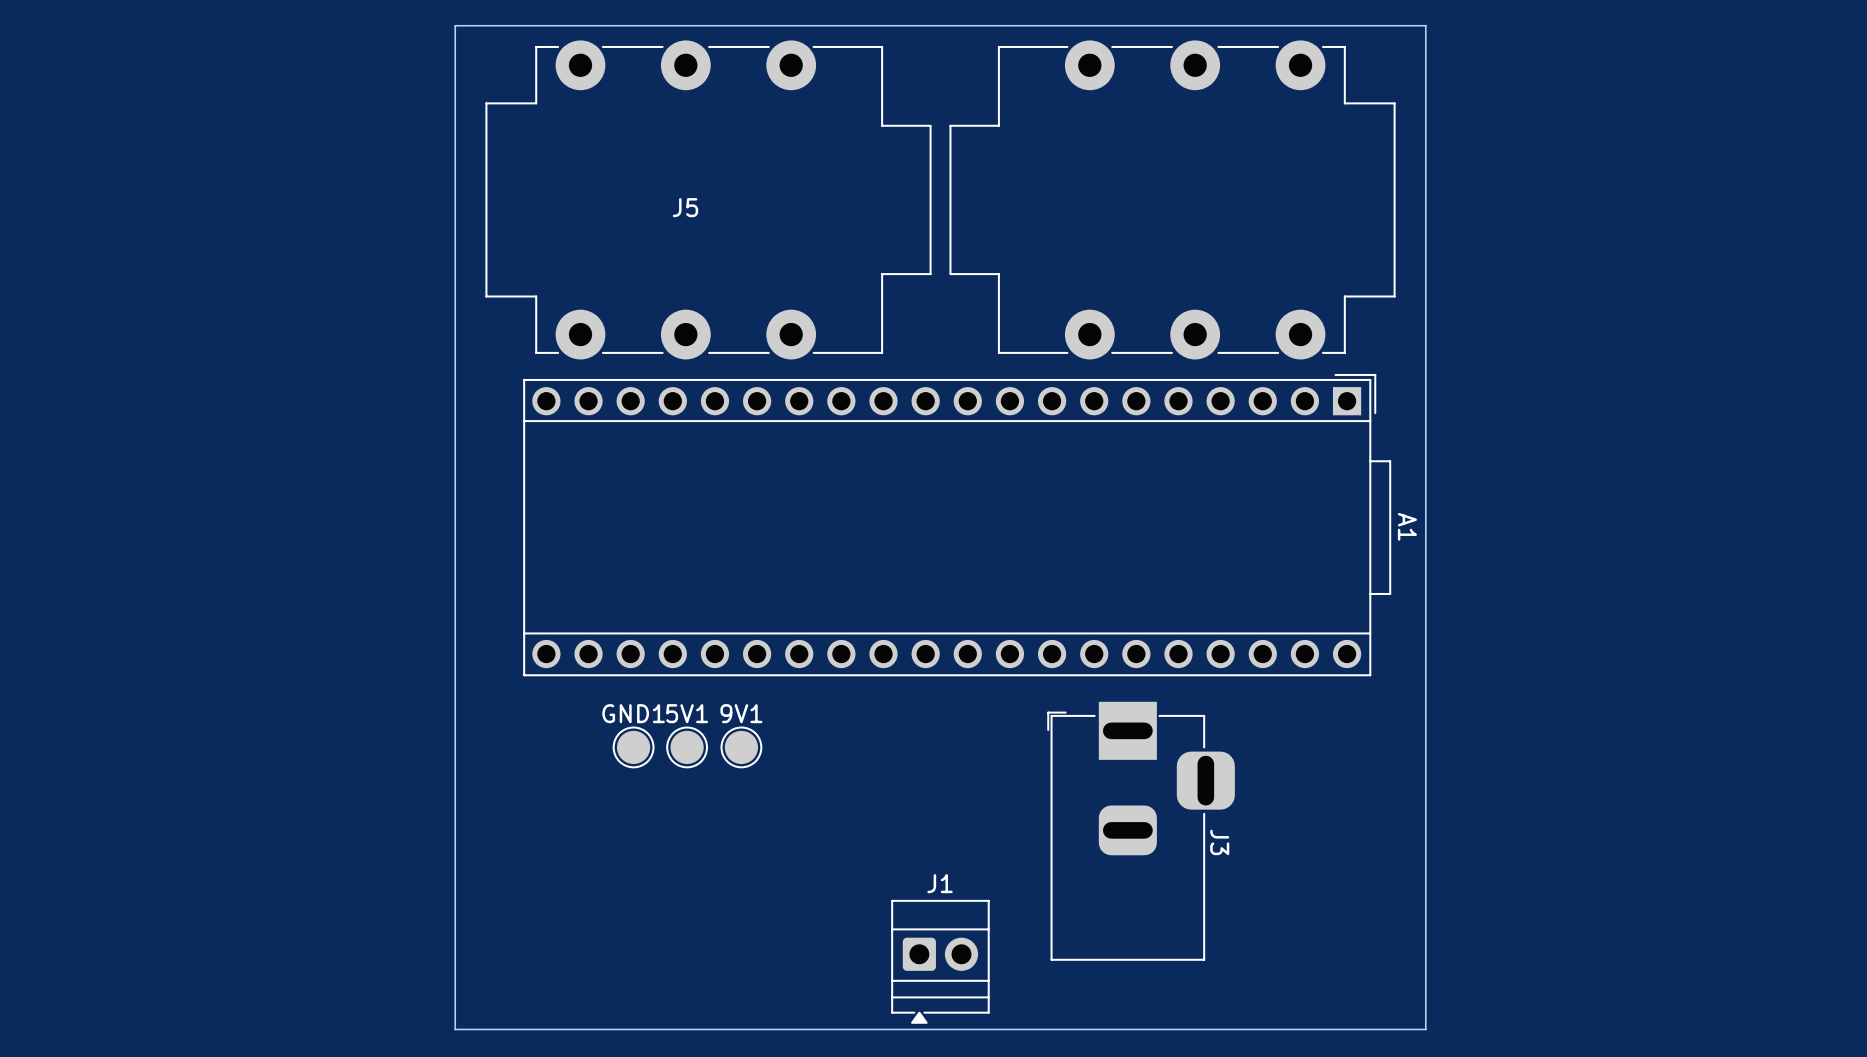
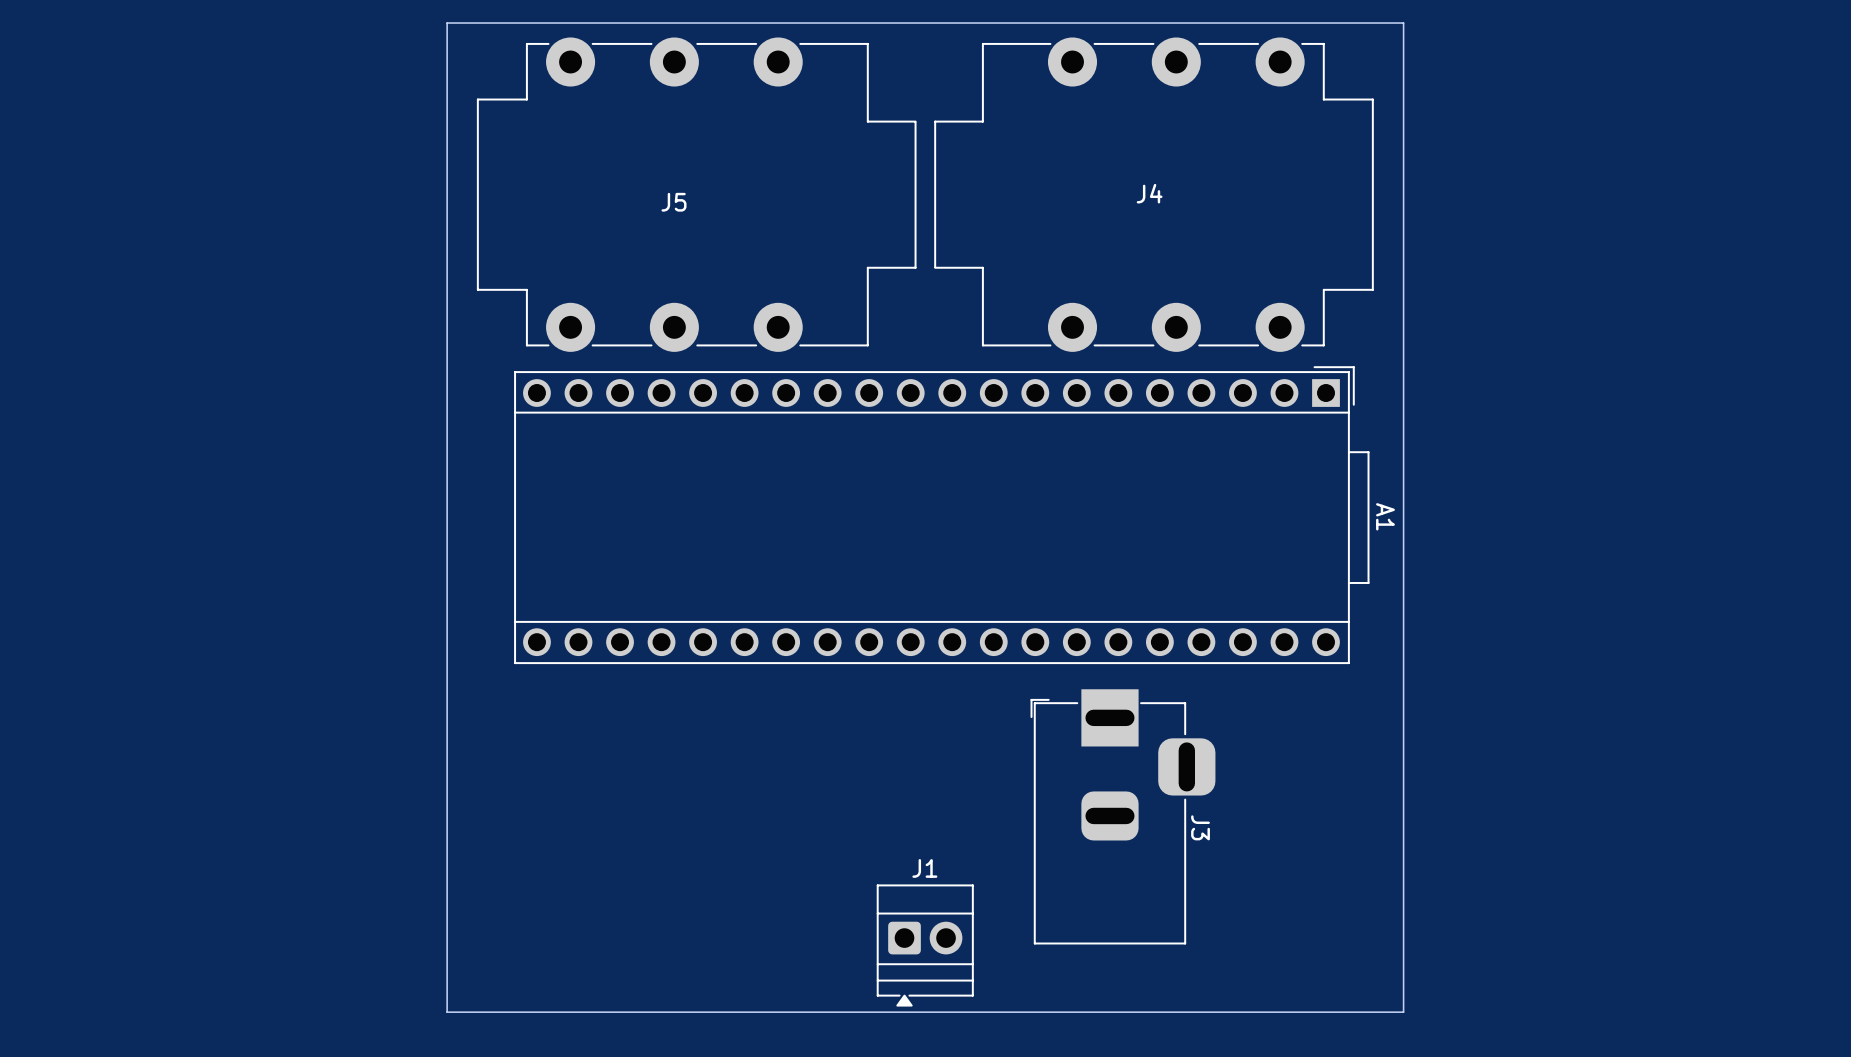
J4 name: none -> J4 (1149, 193)
GND1: (633, 747) -> none
5V1: (687, 747) -> none
9V1: (741, 747) -> none

